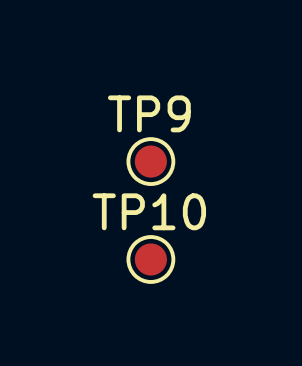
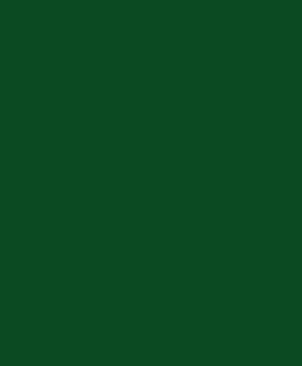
TP9: (150, 161) -> none
TP10: (150, 259) -> none

